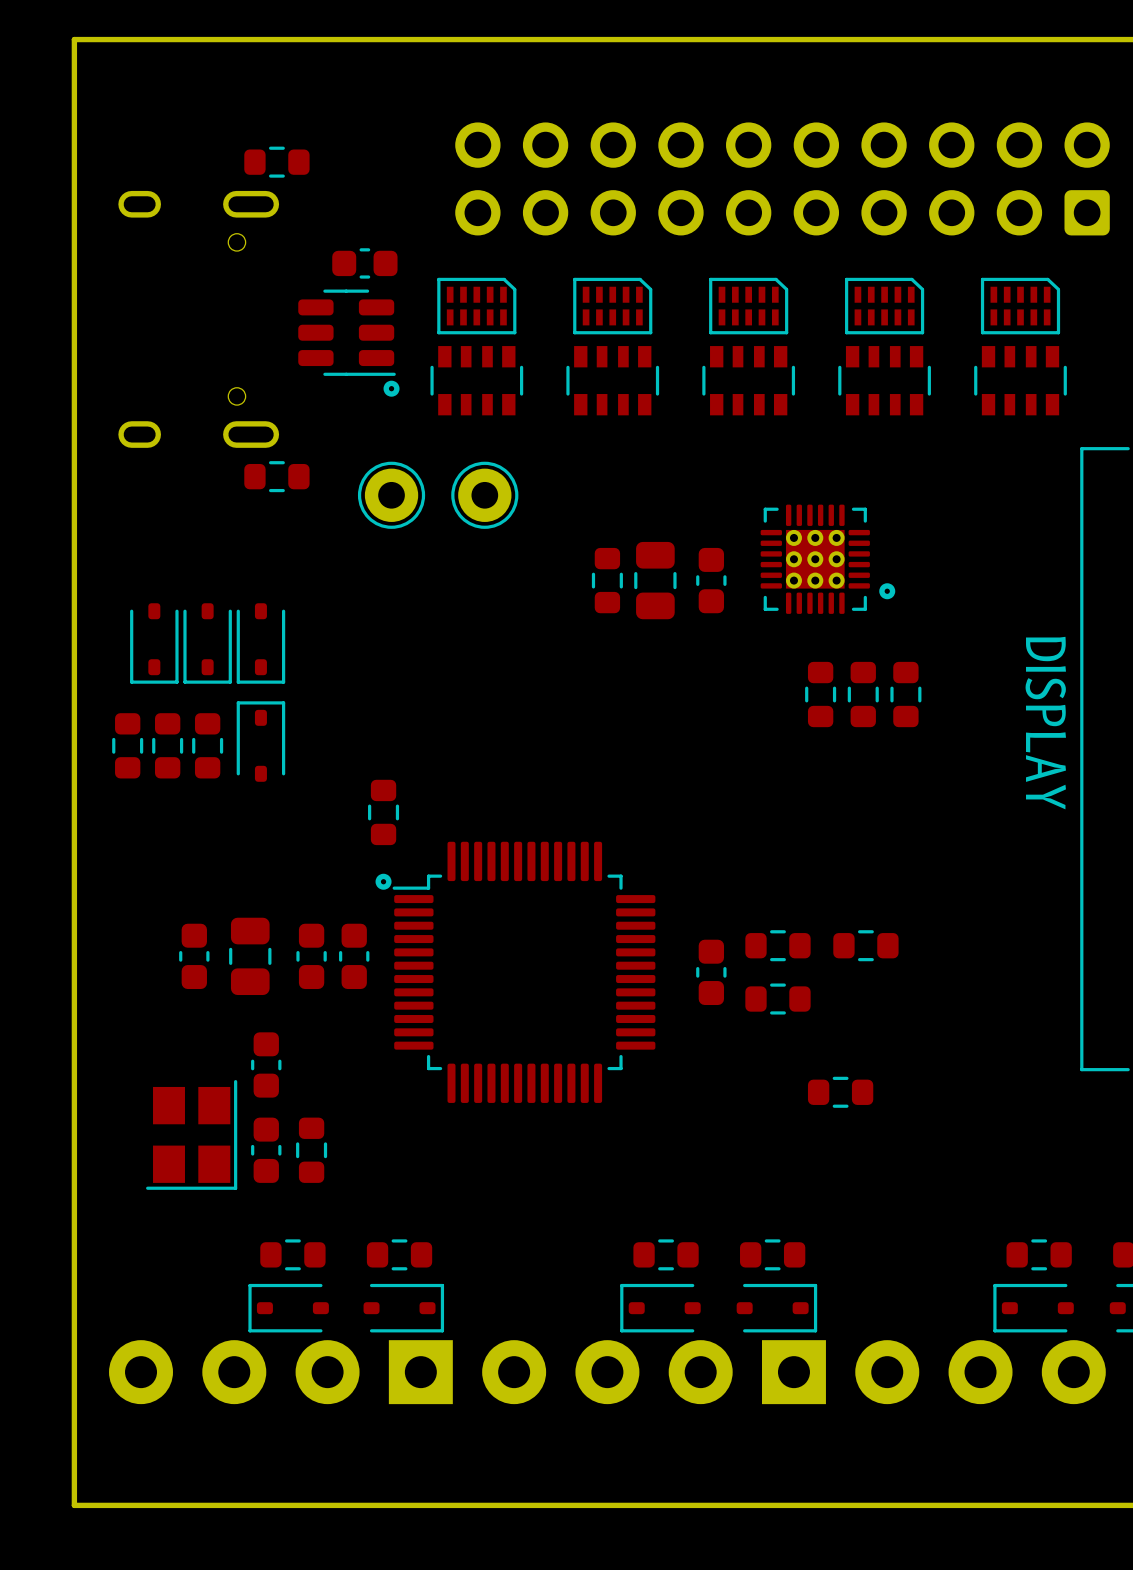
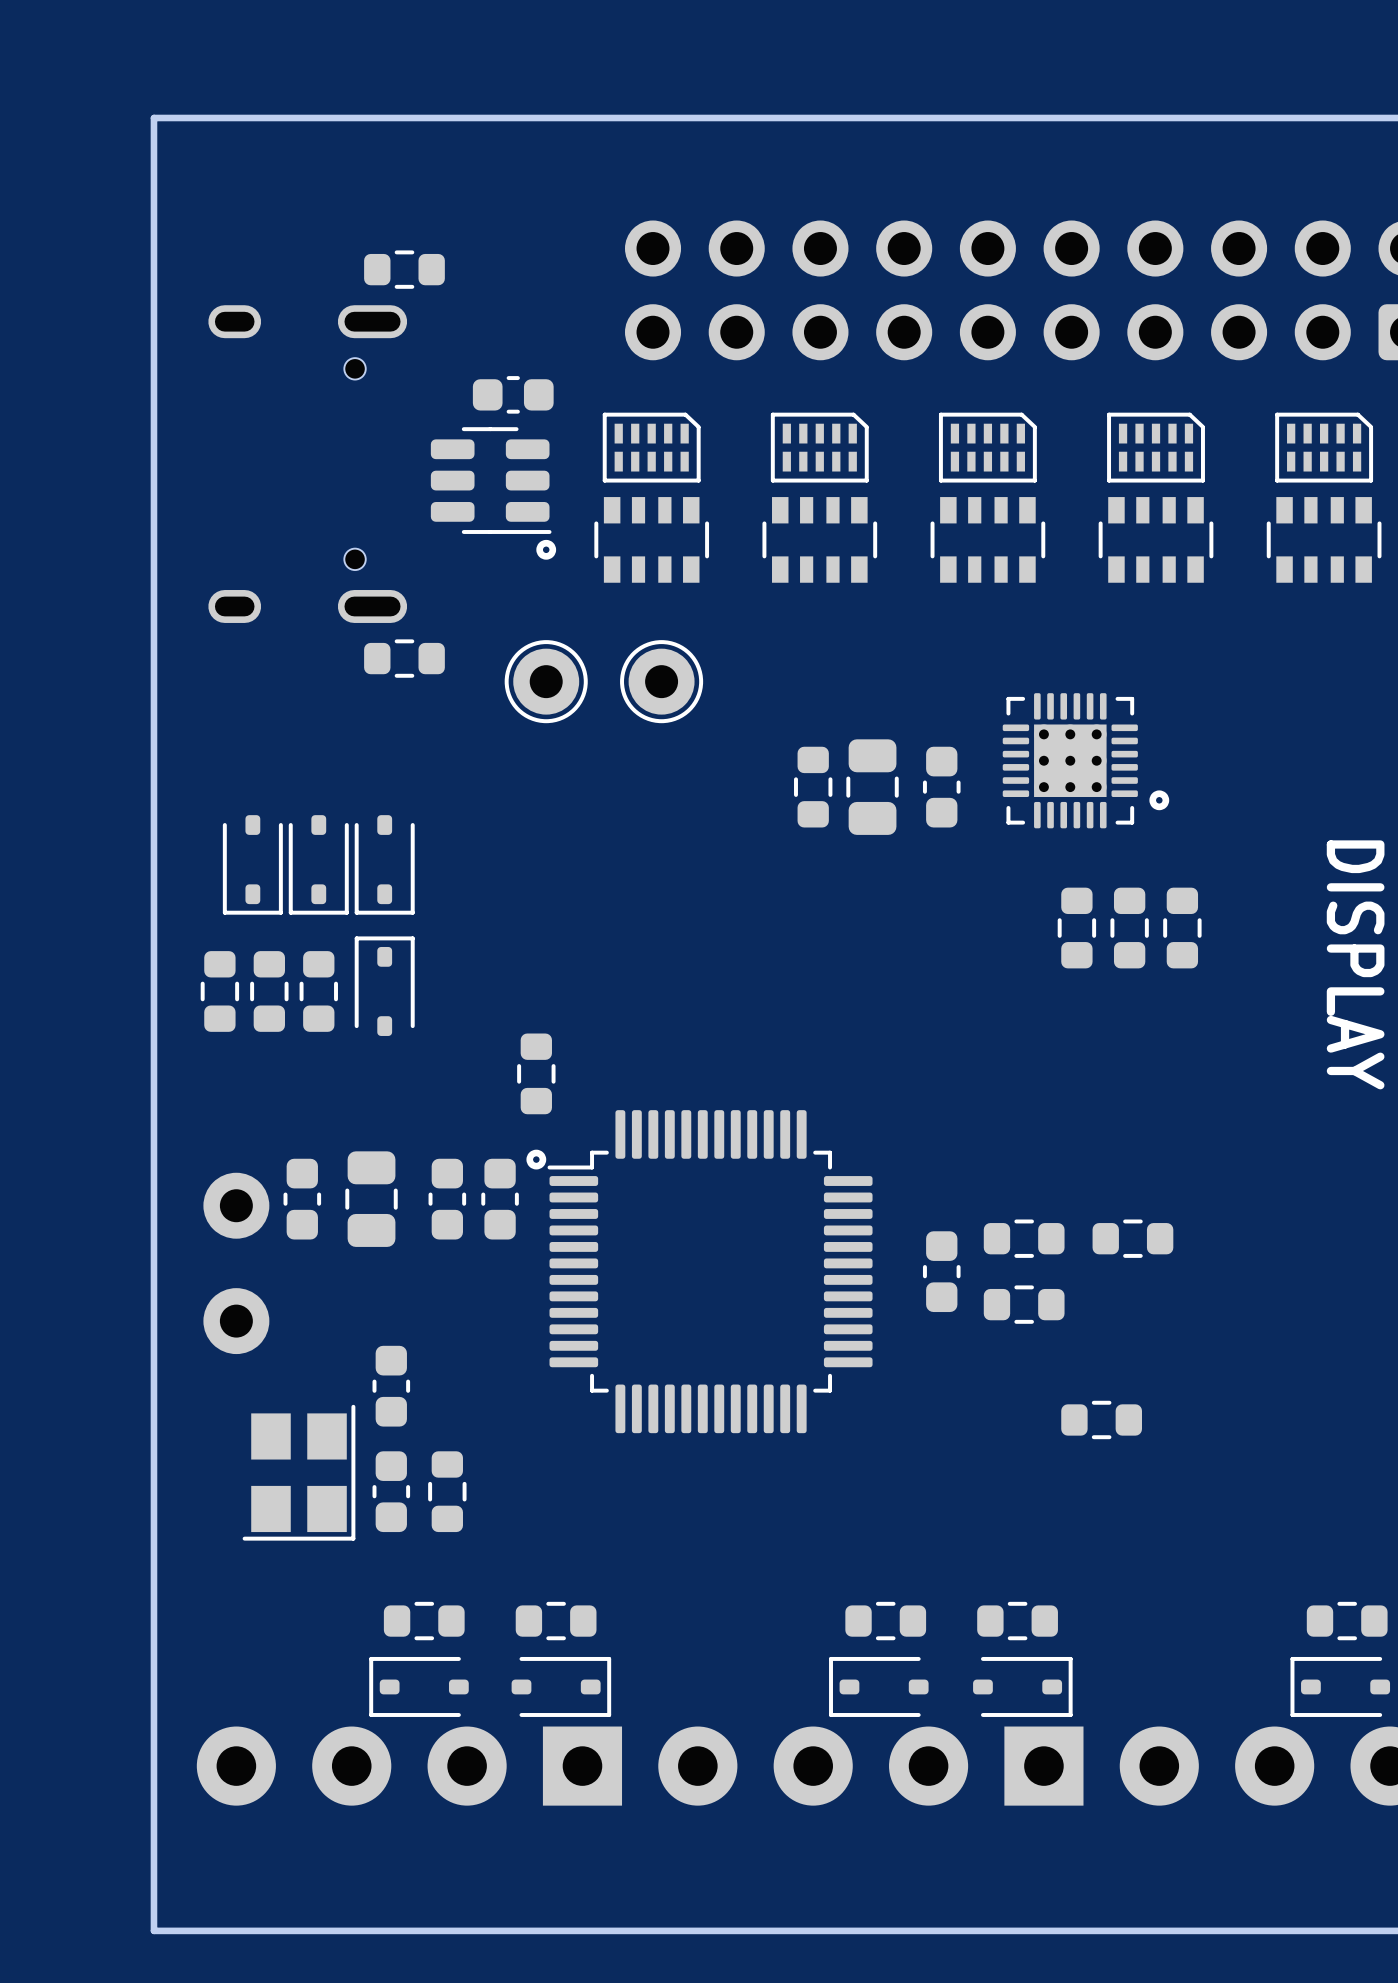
part: none -> (447, 1199)
part: none -> (500, 1199)
part: none -> (236, 1205)
part position: (194, 956) -> (302, 1199)
part position: (250, 956) -> (371, 1199)
part: (311, 956) -> none
part: (354, 956) -> none
part: none -> (236, 1321)

